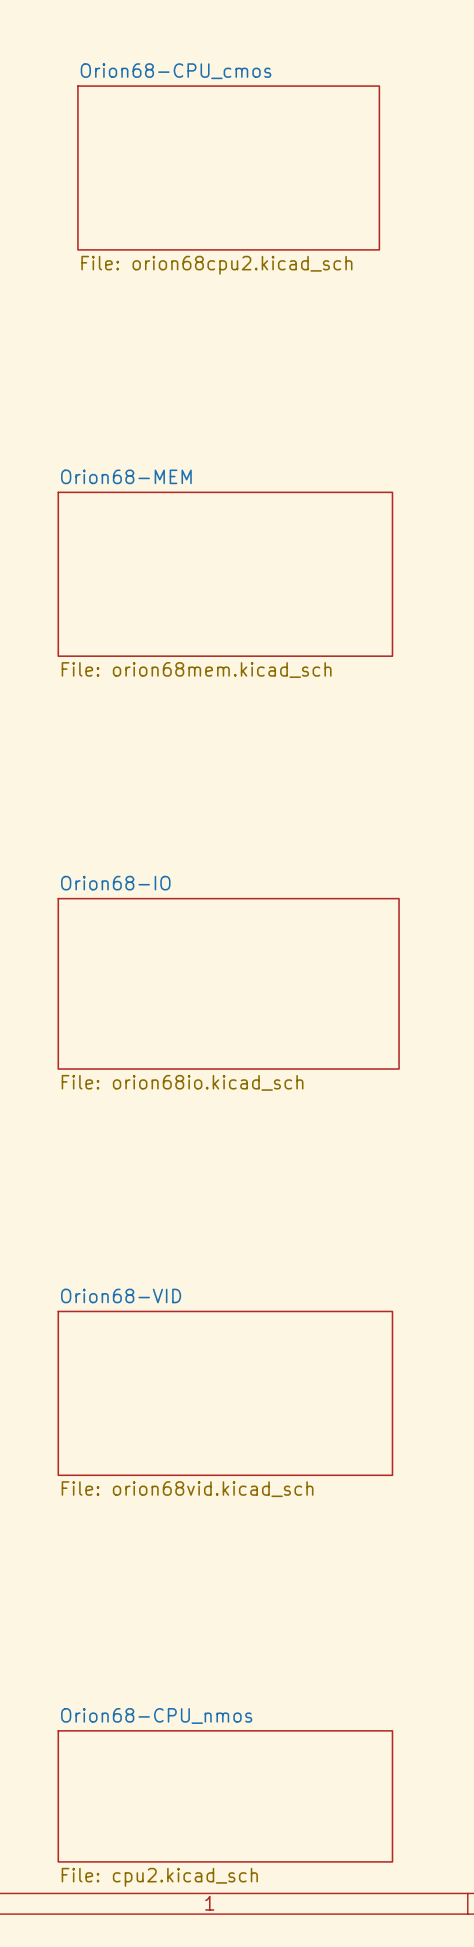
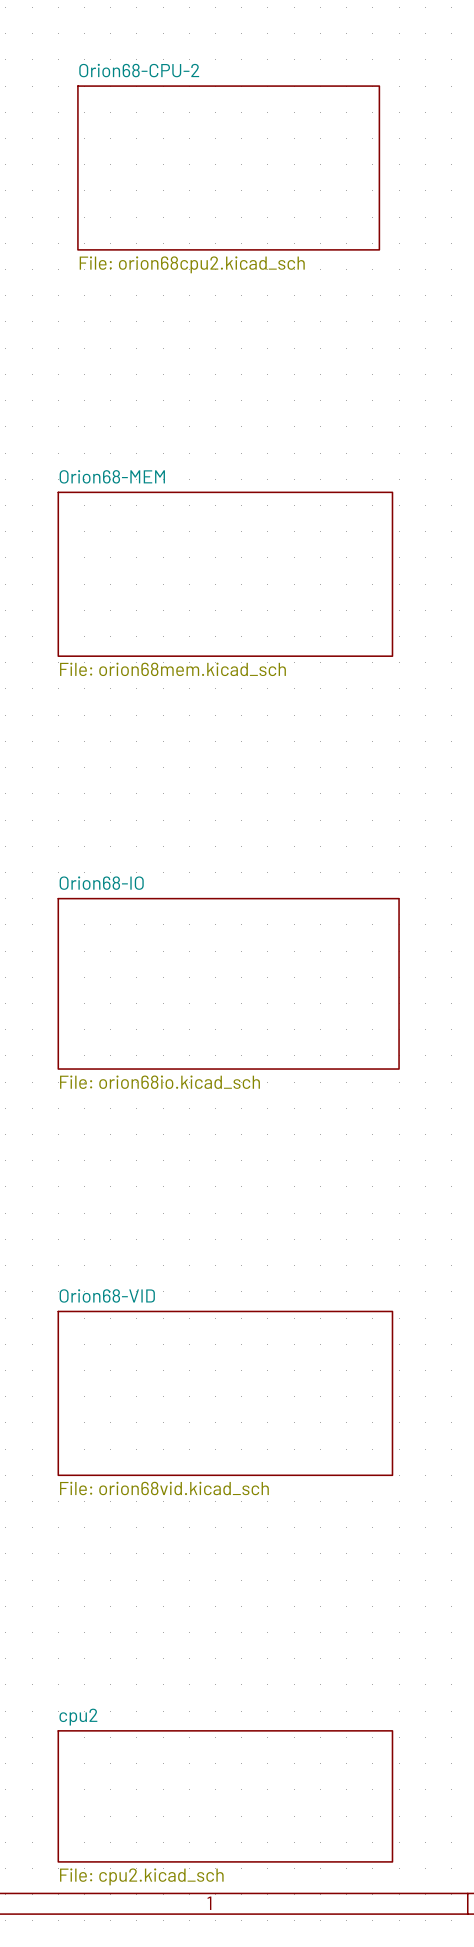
sheet Orion68-CPU_cmos name: Orion68-CPU_cmos (176, 71) -> Orion68-CPU-2 (139, 70)
sheet Orion68-CPU_nmos name: Orion68-CPU_nmos (156, 1715) -> cpu2 (78, 1717)

